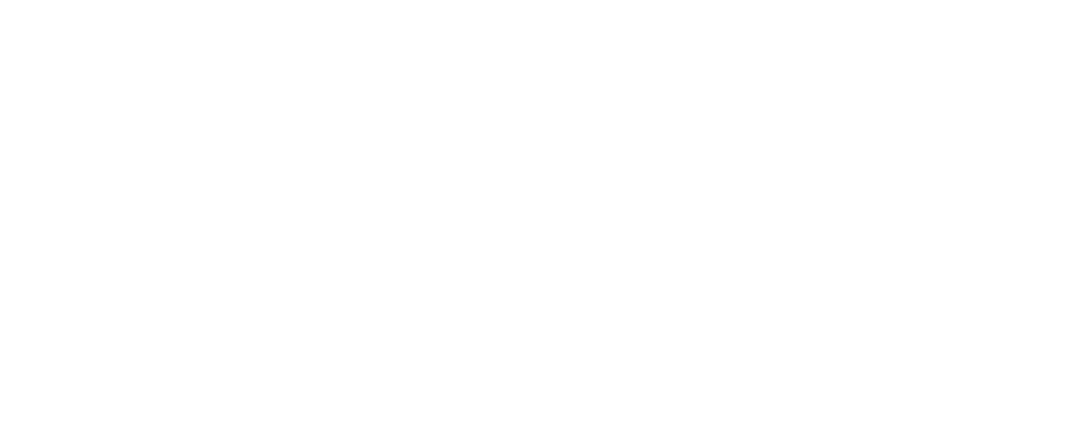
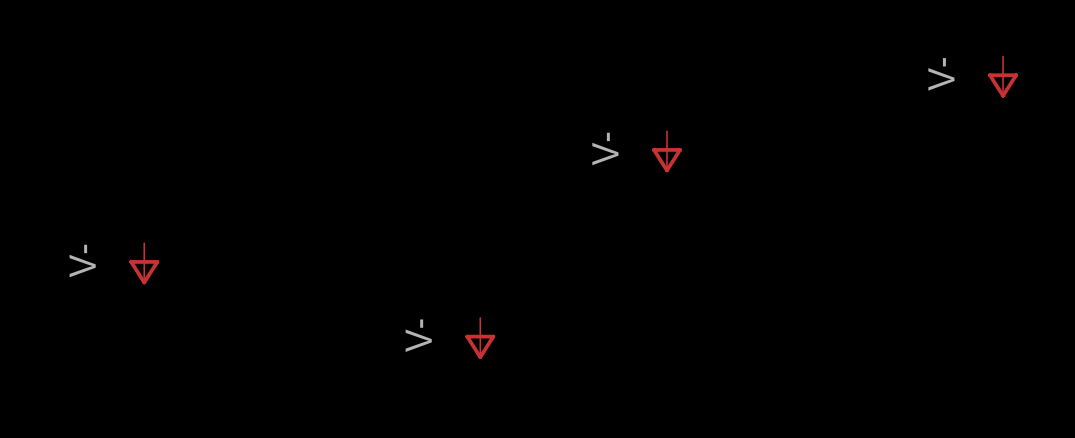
power symbol: none -> V- (1003, 77)
power symbol: none -> V- (666, 151)
power symbol: none -> V- (144, 263)
power symbol: none -> V- (480, 338)

